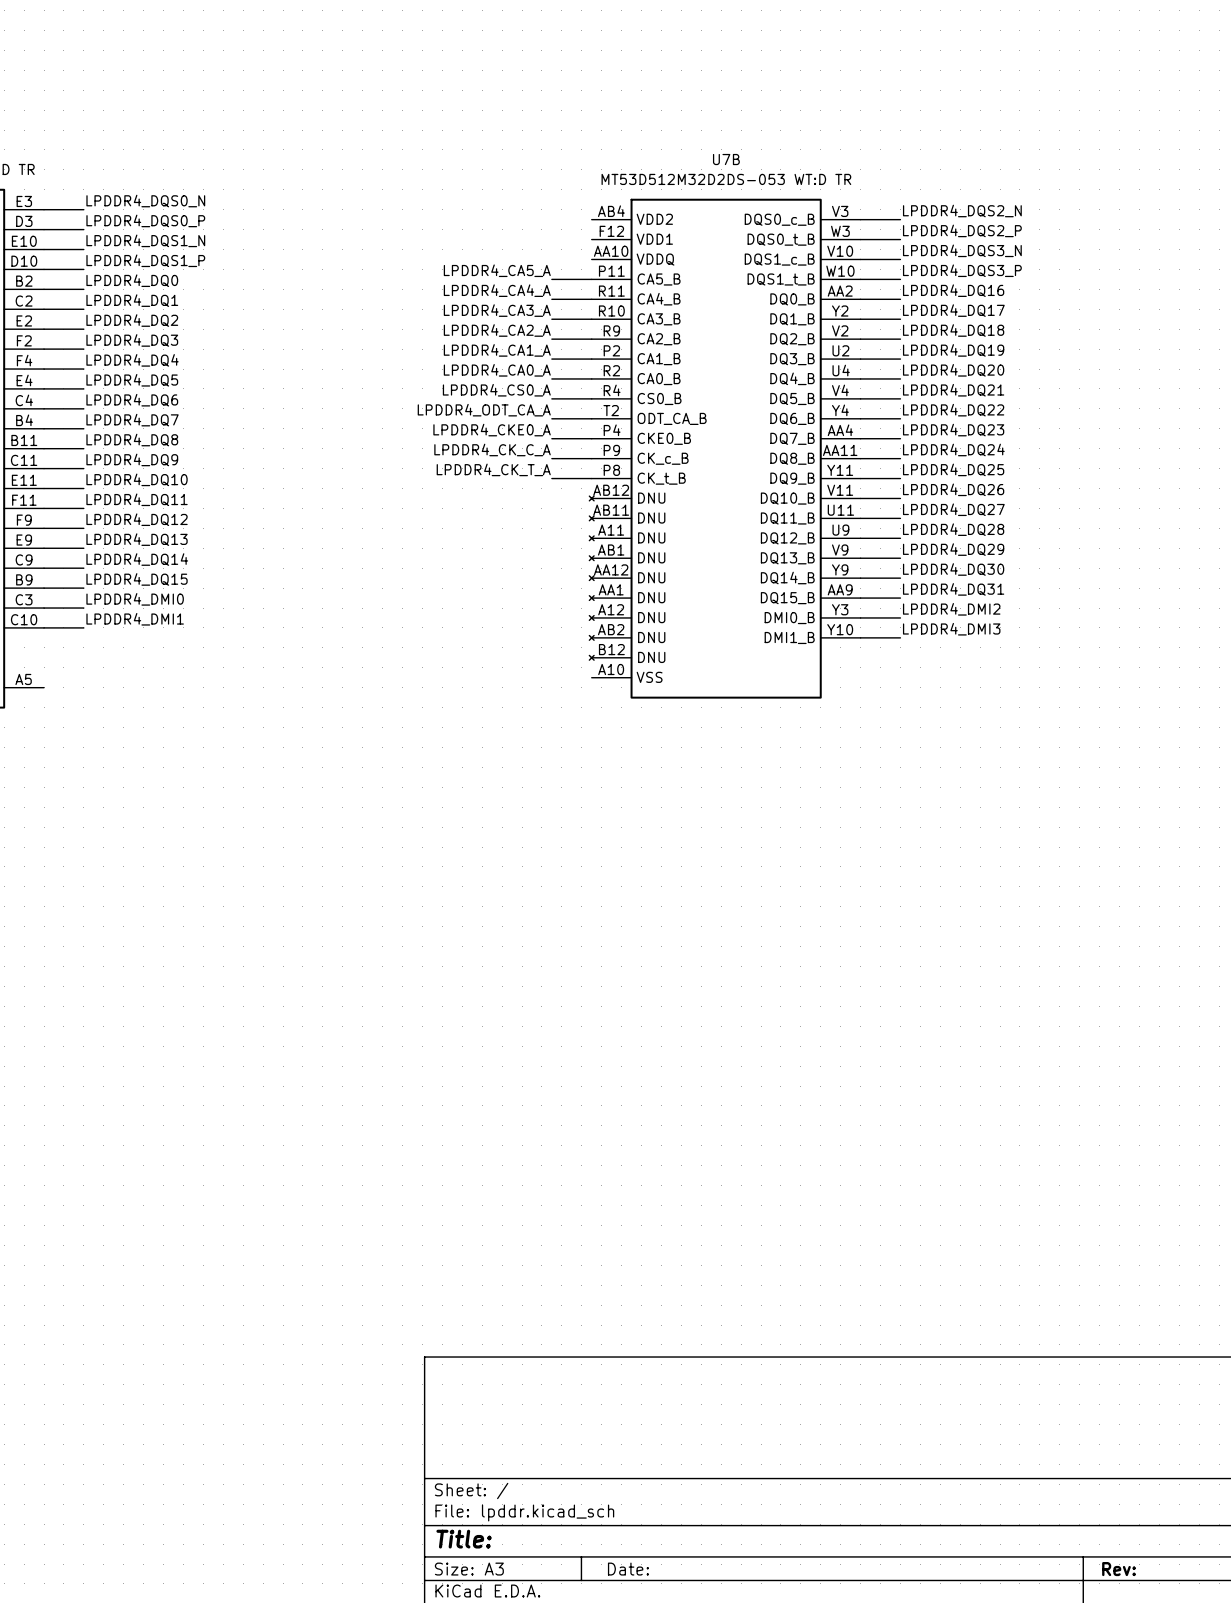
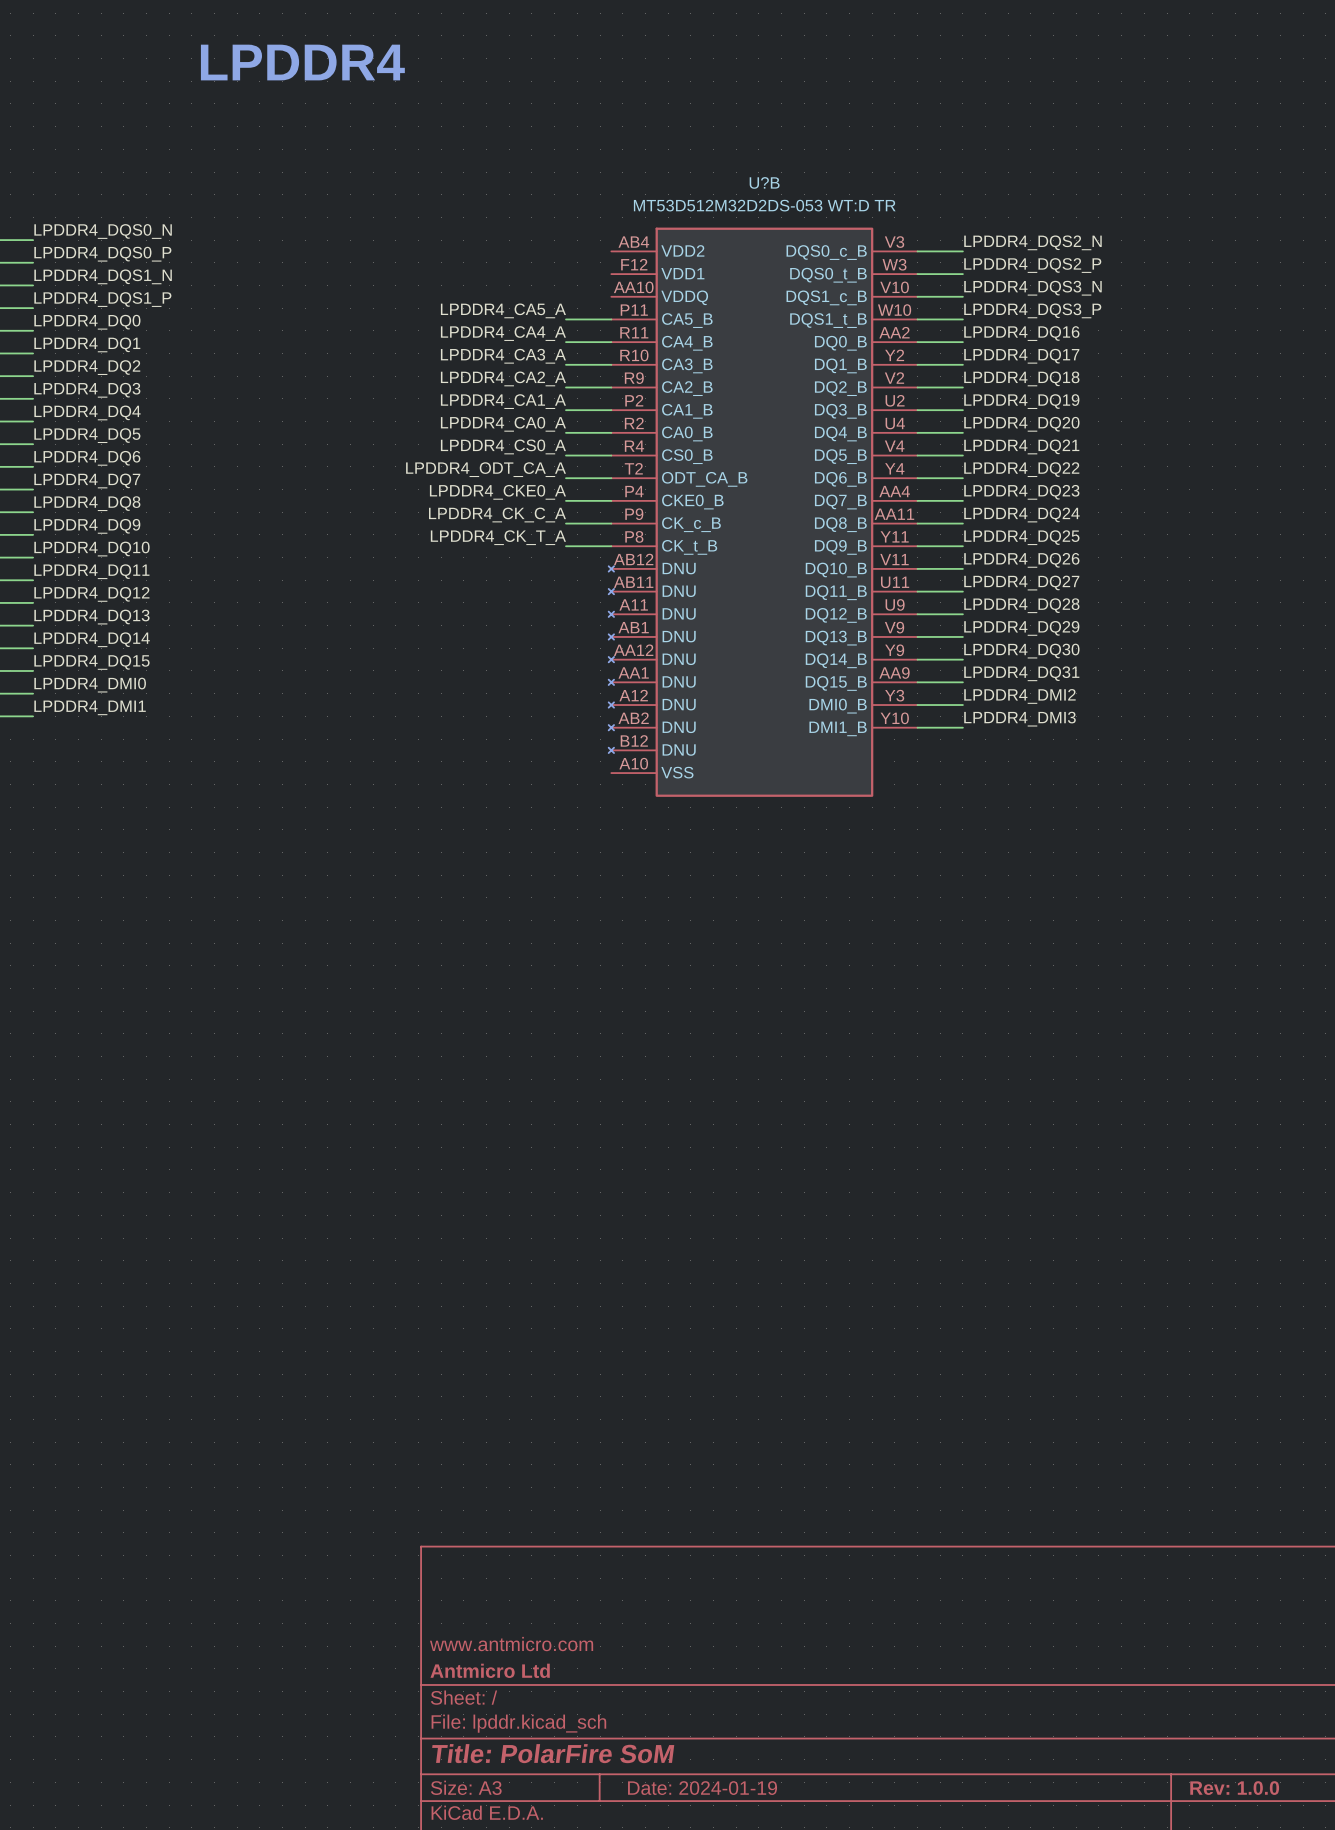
text: none -> LPDDR4 (302, 62)
U7B name: U7B (726, 159) -> U?B (764, 182)
title block: none -> www.antmicro.com (511, 1644)
title block: none -> Antmicro Ltd (490, 1670)
title block: Title: (464, 1539) -> Title: PolarFire SoM (553, 1753)
title block: Date: (628, 1569) -> Date: 2024-01-19 (702, 1788)
title block: Rev: (1118, 1569) -> Rev: 1.0.0 (1234, 1788)

